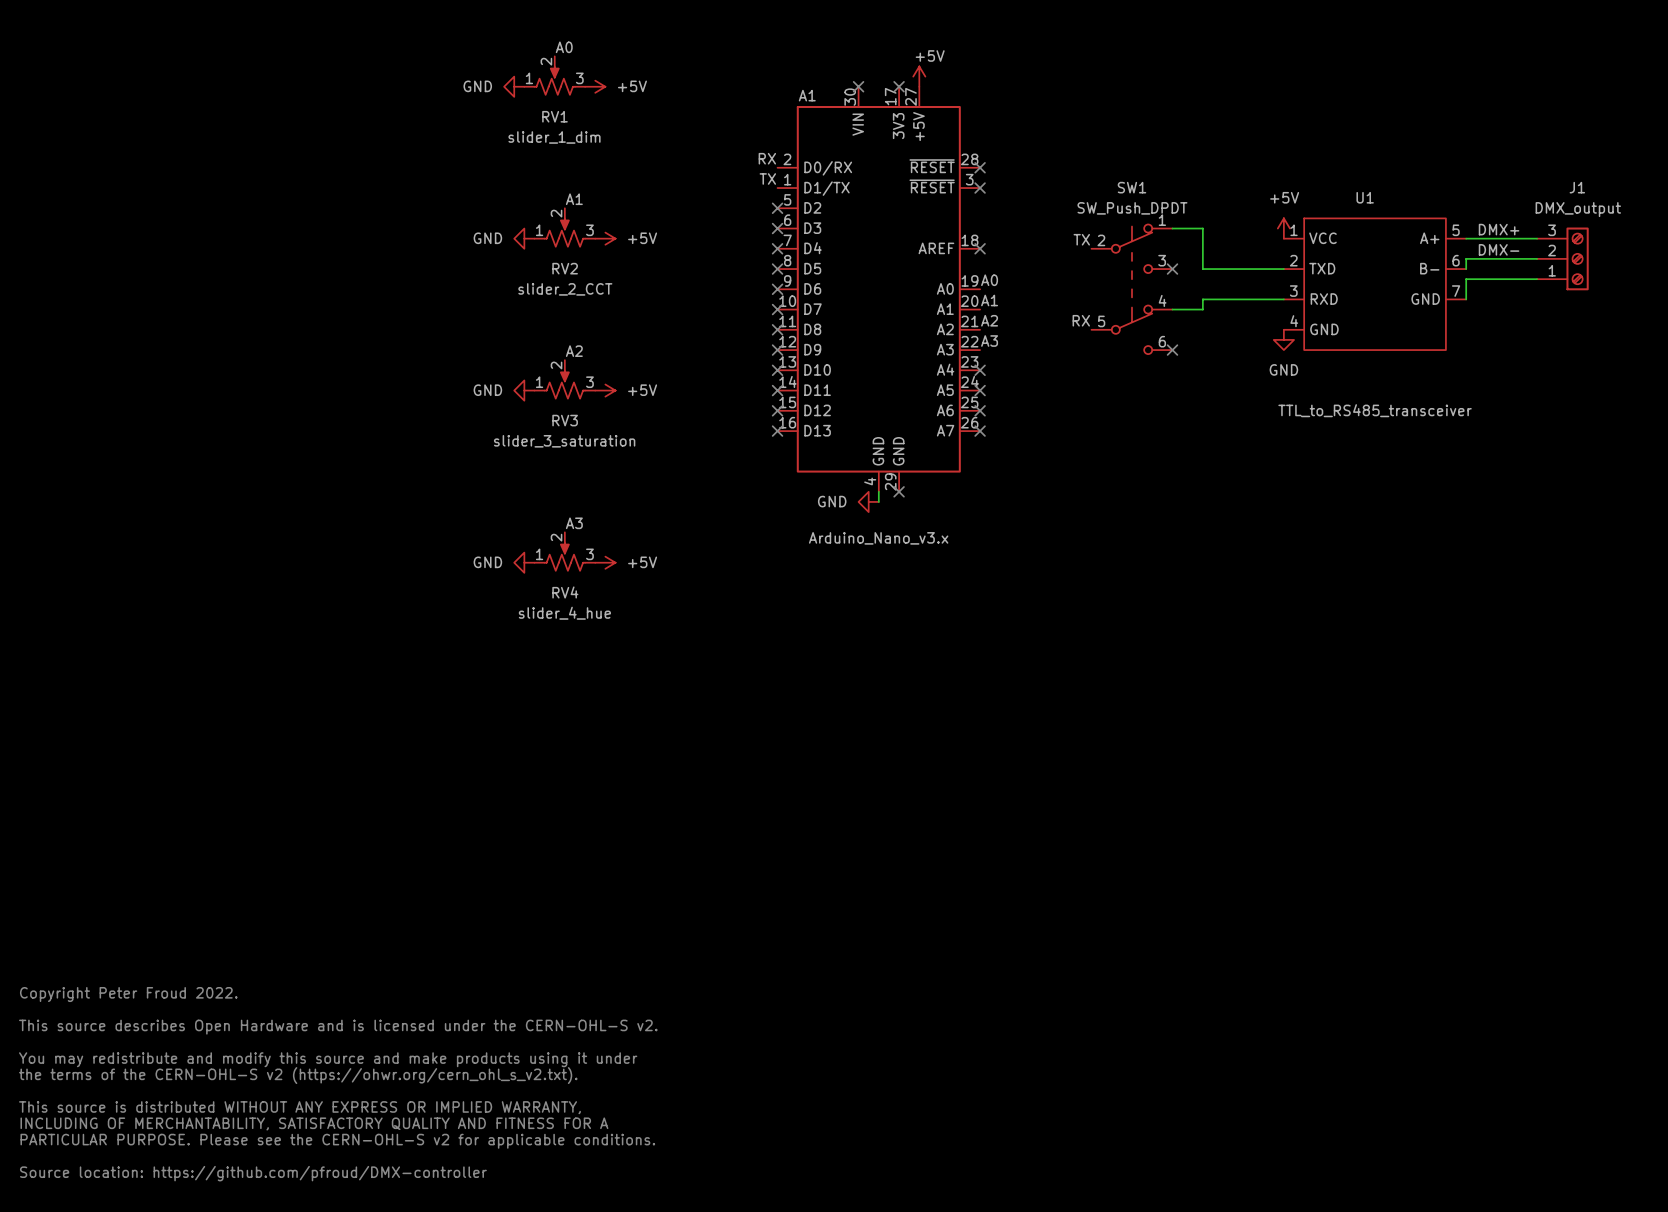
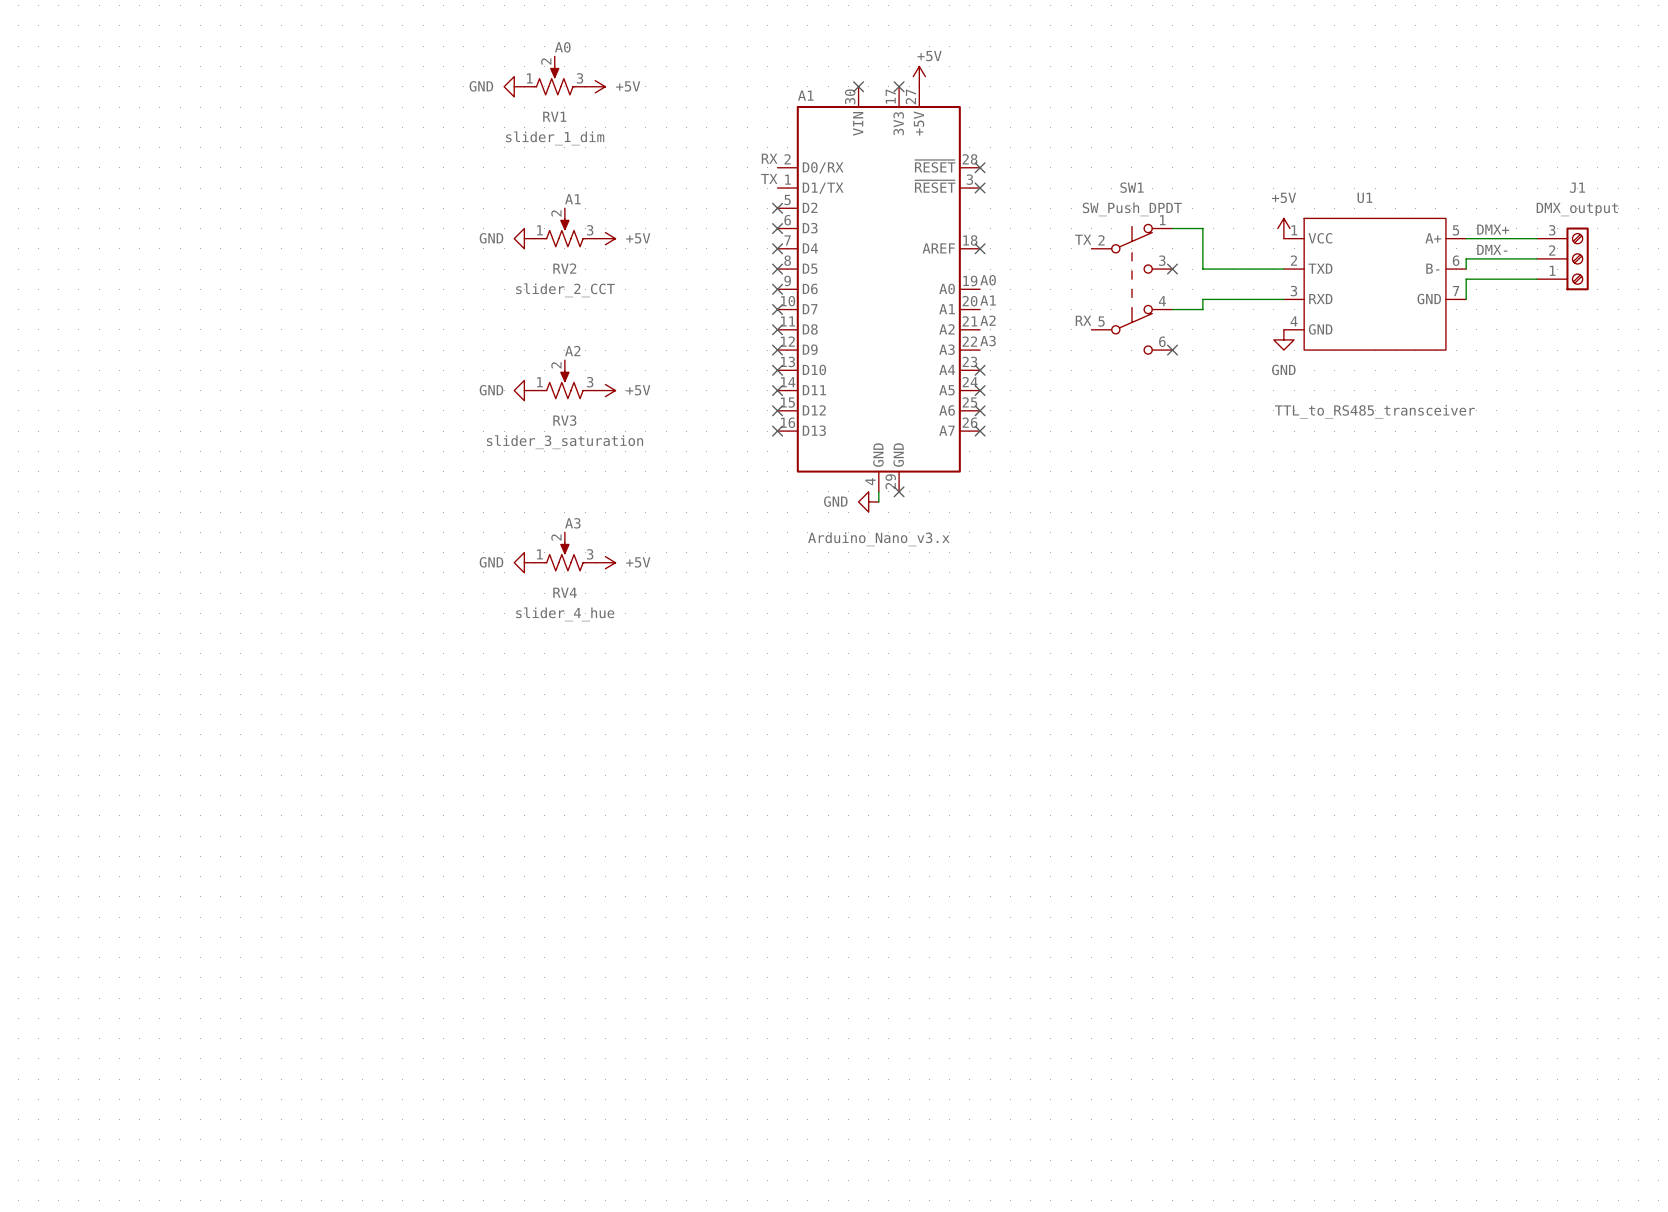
text: Copyright Peter Froud 2022. (128, 994) -> none
text: This source describes Open Hardware and is licensed under the CERN-OHL-S v2. (338, 1027) -> none
text: You may redistribute and modify this source and make products using it under (328, 1059) -> none
text: the terms of the CERN-OHL-S v2 (https://ohwr.org/cern_ohl_s_v2.txt). (298, 1075) -> none
text: This source is distributed WITHOUT ANY EXPRESS OR IMPLIED WARRANTY, (299, 1107) -> none
text: INCLUDING OF MERCHANTABILITY, SATISFACTORY QUALITY AND FITNESS FOR A (314, 1123) -> none
text: PARTICULAR PURPOSE. Please see the CERN-OHL-S v2 for applicable conditions. (337, 1141) -> none
text: Source location: https://github.com/pfroud/DMX-controller (253, 1173) -> none

